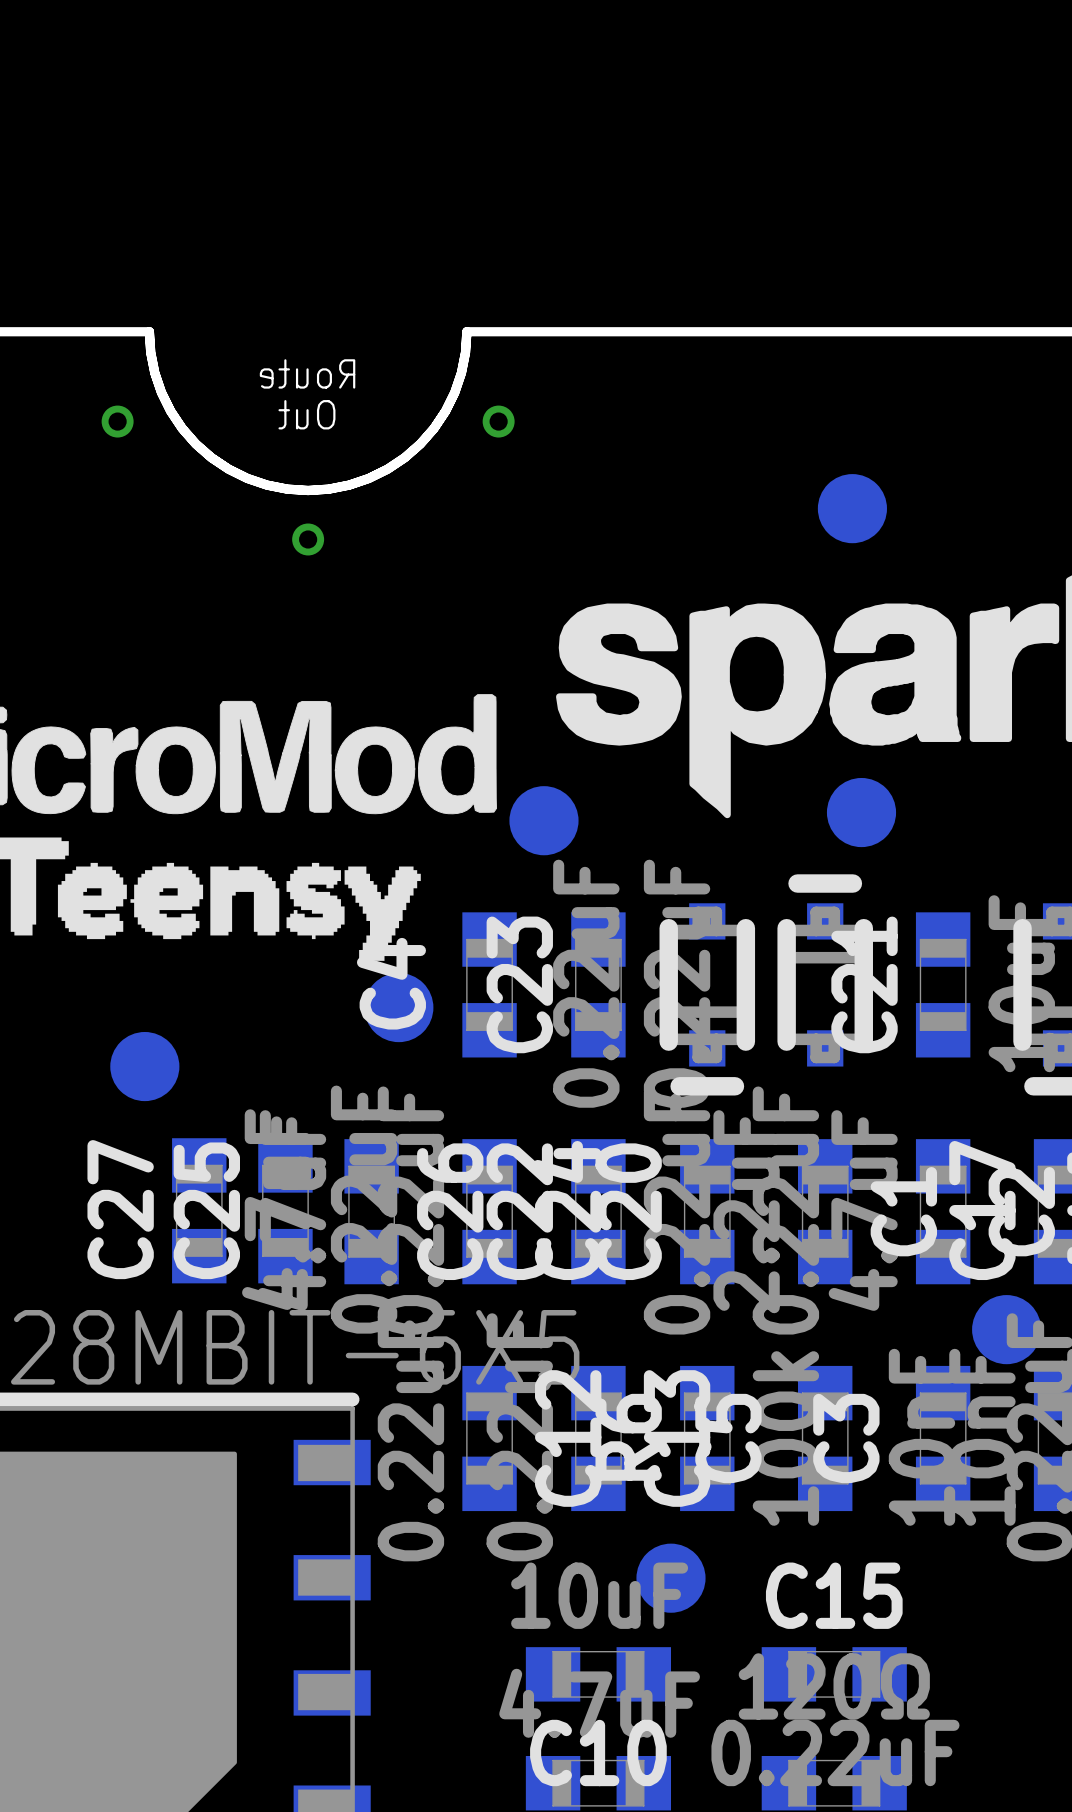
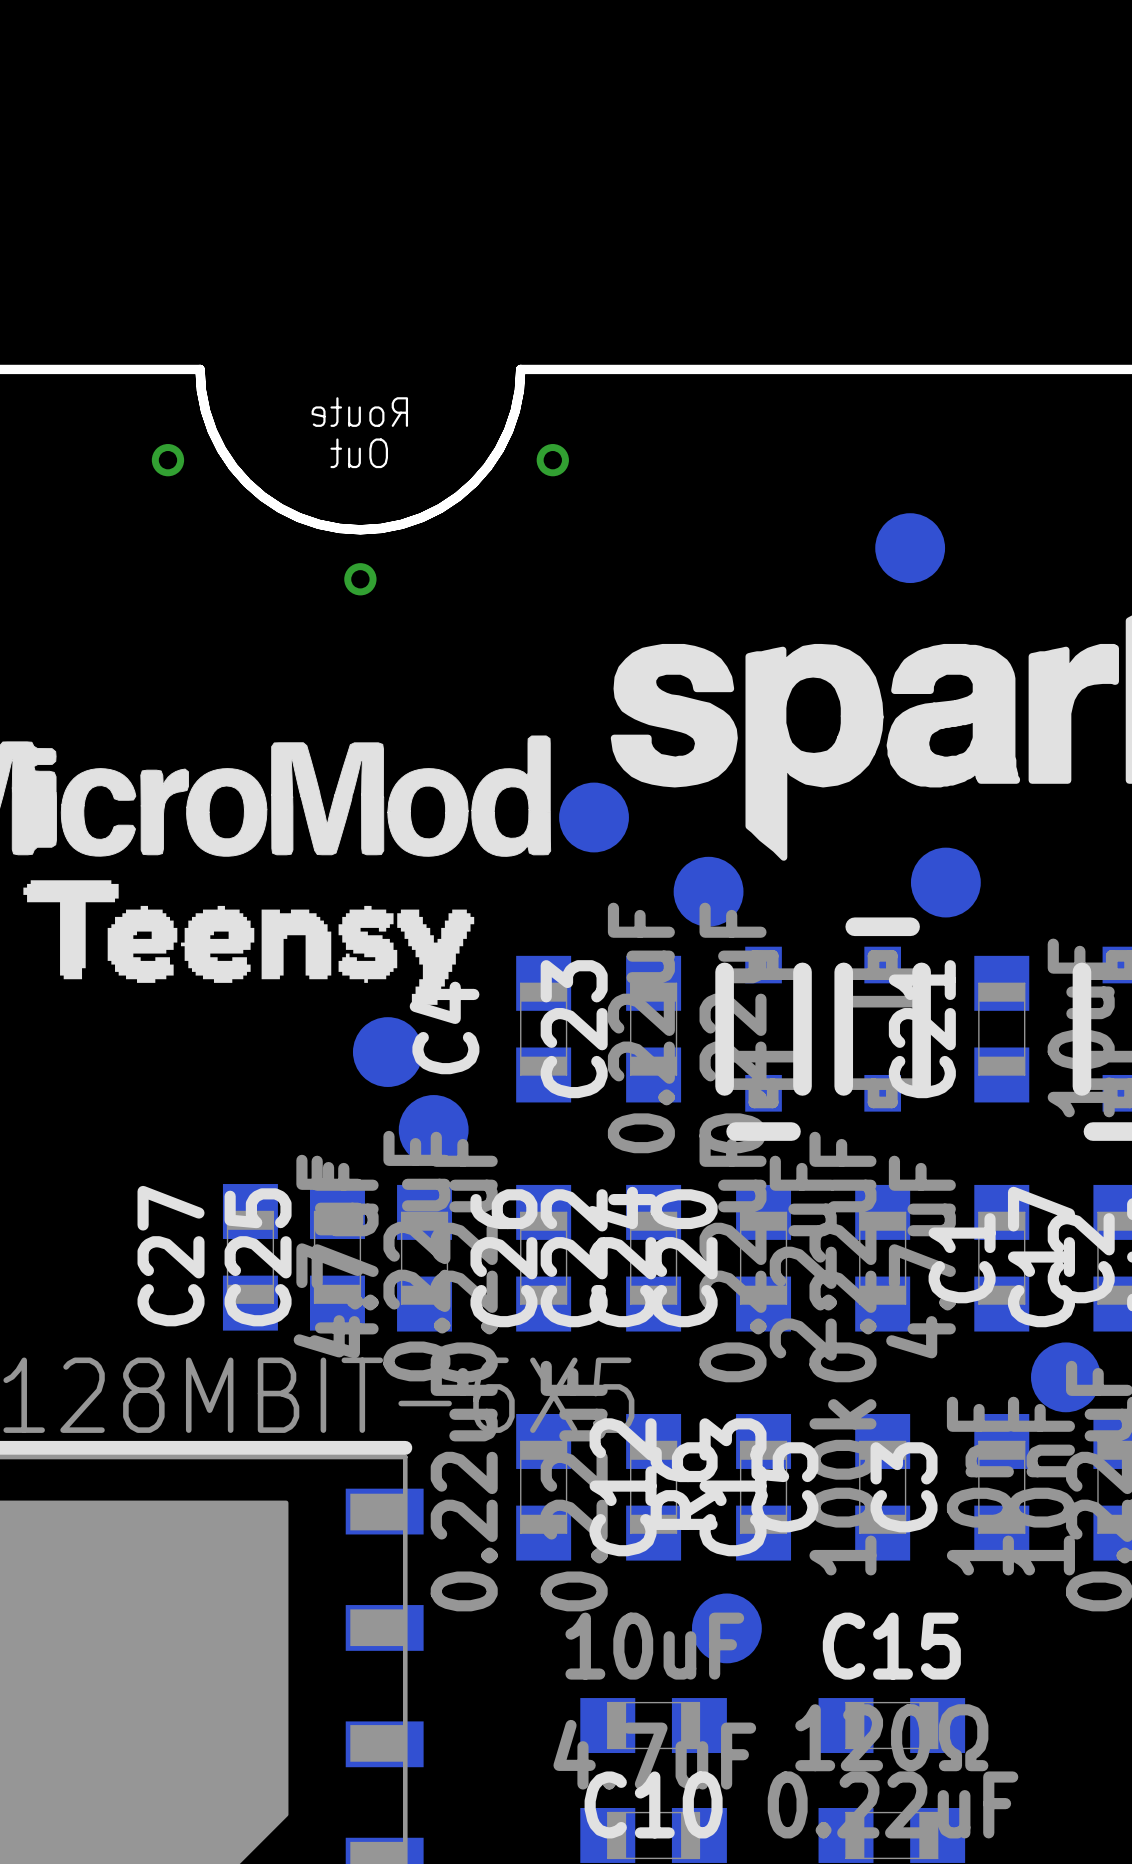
part position: (861, 812) -> (945, 882)
part position: (543, 820) -> (594, 817)
part: none -> (708, 891)
part: none -> (387, 1052)
part: (398, 1007) -> none
part: (144, 1066) -> none
part: none -> (433, 1129)

